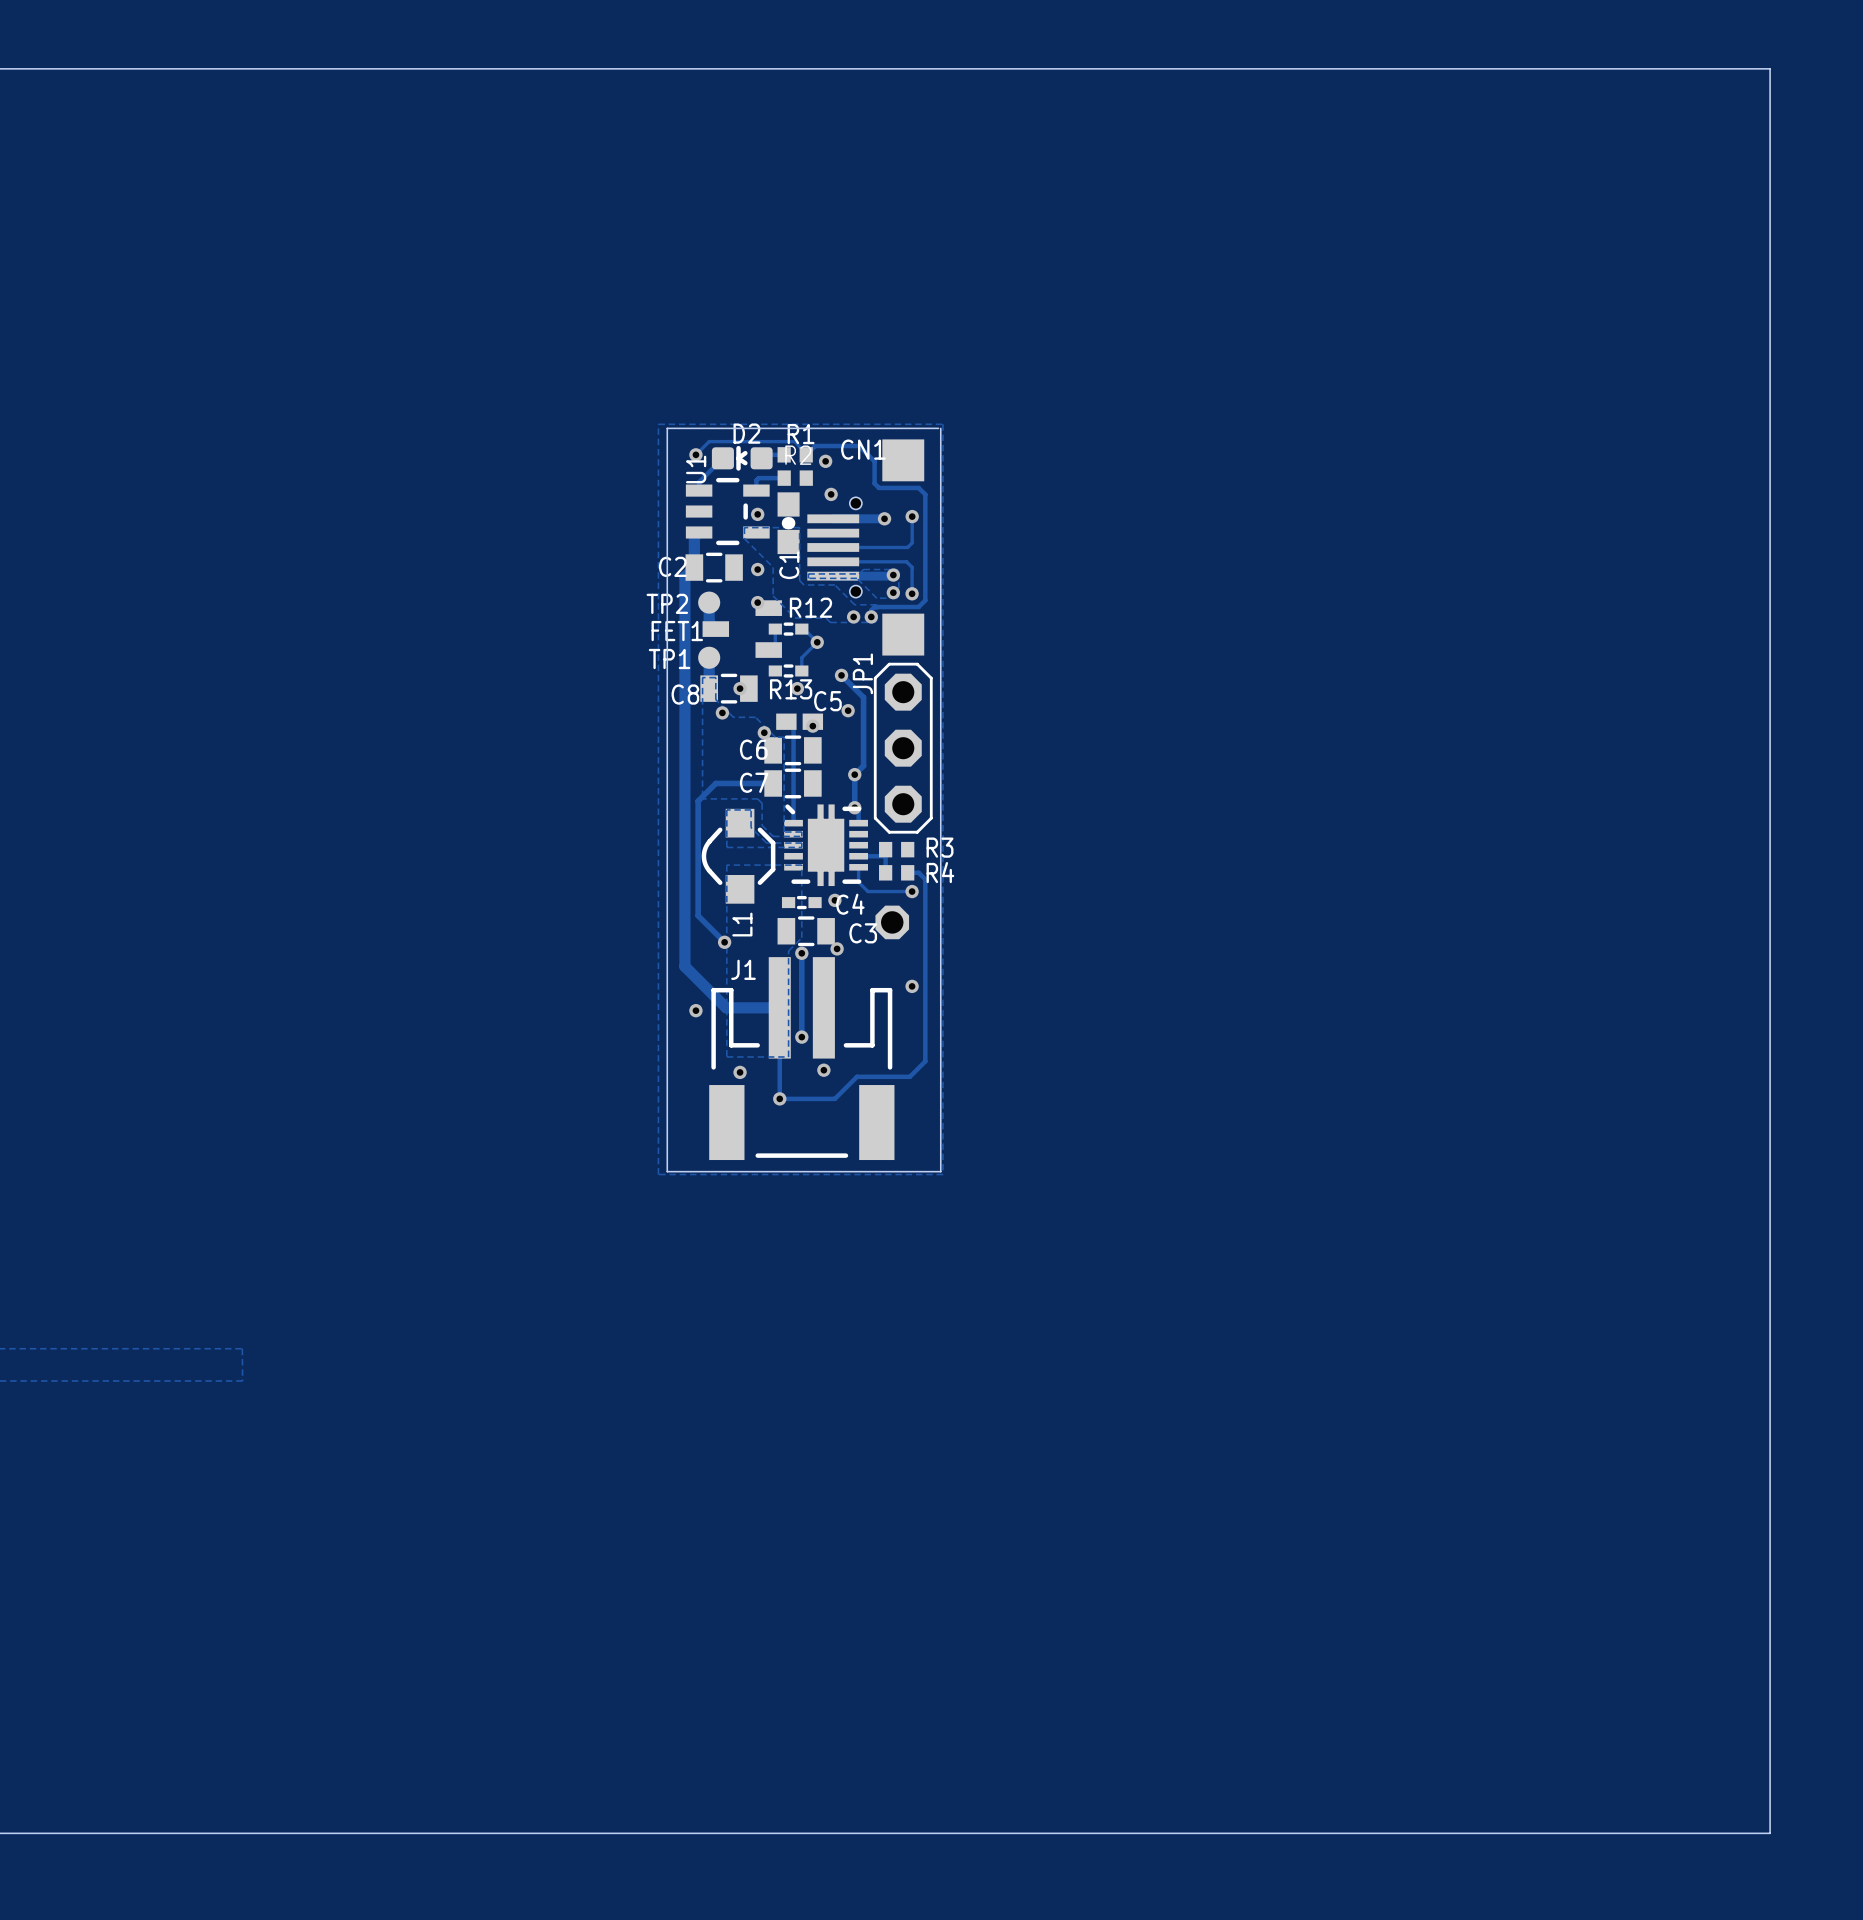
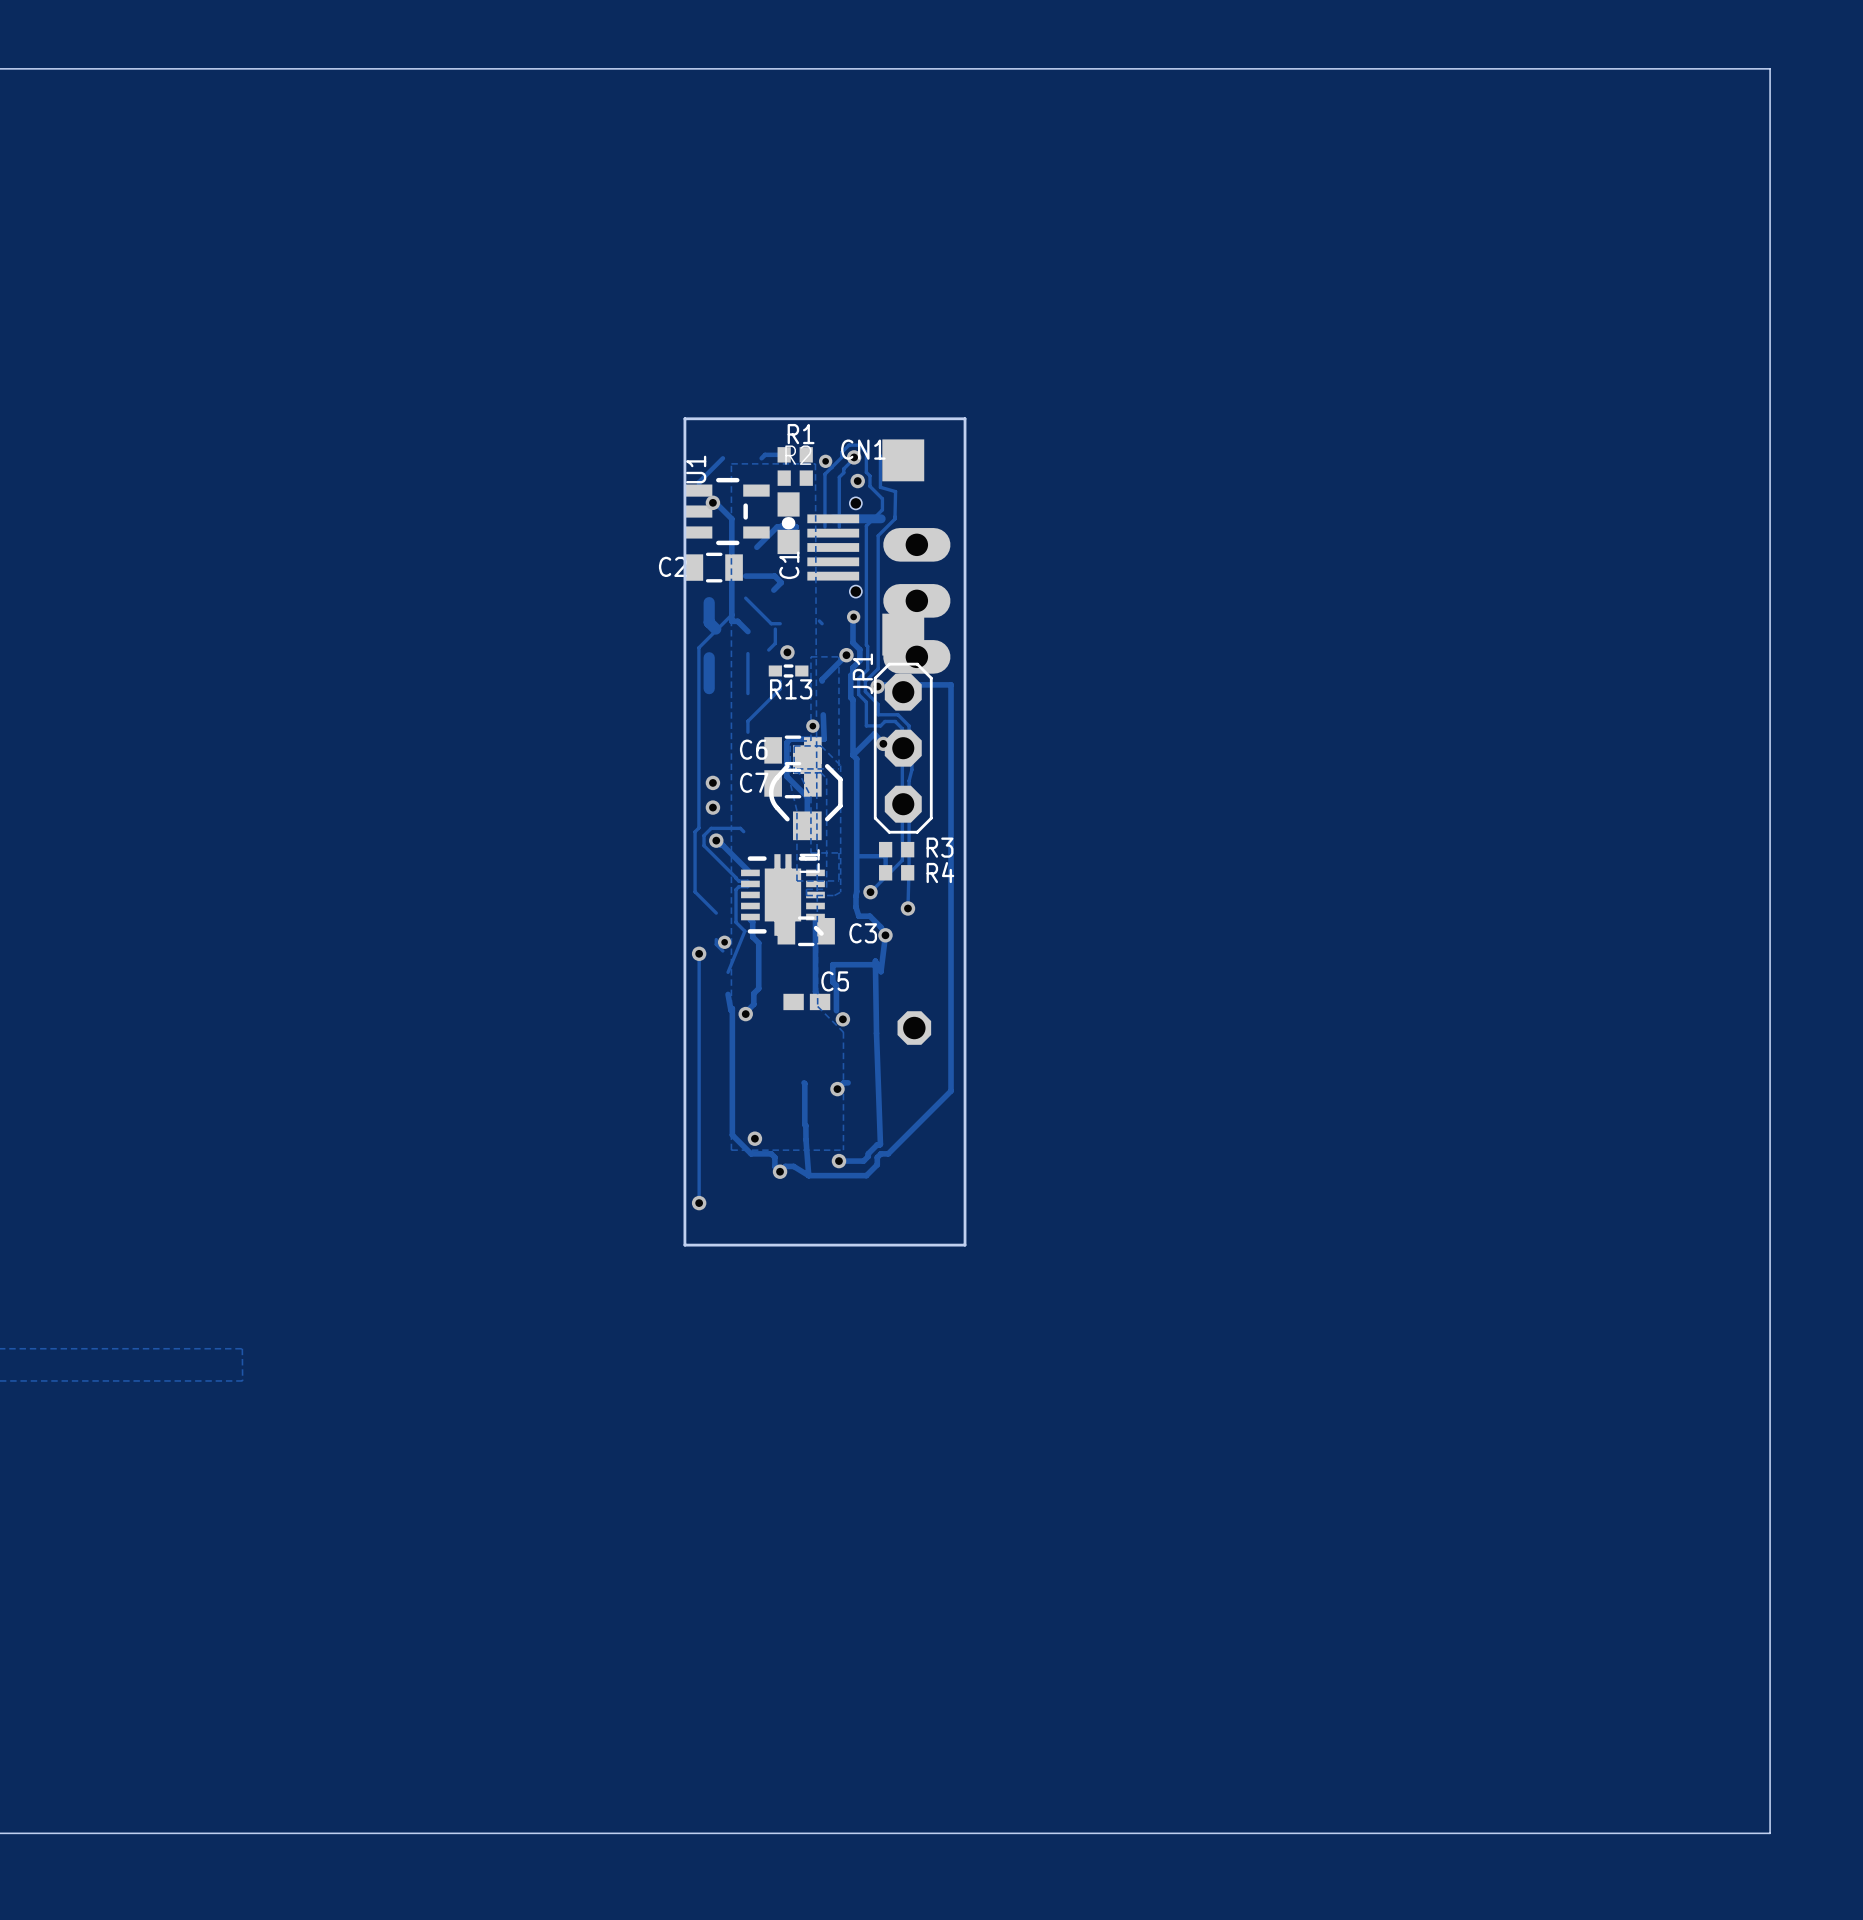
board edge: none -> (684, 418) (965, 418) (965, 1245) (684, 1245) (684, 418)
zone outline: (658, 424) (942, 424) (942, 1174) (658, 1174) (658, 424) -> none
board edge: (938, 428) (667, 428) (667, 1171) (940, 1171) (940, 428) -> none
track: (695, 454) (709, 441) (795, 441) (806, 454) (815, 446) (859, 446) (874, 461) (874, 483) (879, 487) (918, 487) (925, 494) (925, 600) (918, 607) (874, 607) (871, 610) (871, 616) -> none
via: (695, 454) -> none
track: none -> (880, 455) (880, 487) (895, 491) (895, 518) (878, 535) (878, 668) (865, 681) (865, 691) (878, 704) (878, 714) (897, 714) (909, 725) (911, 769) (909, 780) (907, 908)
track: none -> (854, 457) (839, 477) (839, 526)
via: none -> (854, 457)
D2: (742, 458) -> none
zone outline: none -> (731, 463) (815, 463) (817, 1006) (843, 1032) (843, 1150) (731, 1150) (731, 463)
track: (784, 478) (758, 478) (756, 480) (756, 490) -> none
via: none -> (857, 481)
via: (831, 494) -> none
track: none -> (712, 502) (715, 502) (731, 518) (731, 621) (737, 621) (747, 631)
via: none -> (712, 502)
via: (757, 514) -> none
track: (912, 516) (912, 542) (907, 547) (833, 547) -> none
via: (912, 516) -> none
via: (884, 518) -> none
track: none -> (781, 525) (796, 526) (777, 526) (756, 547)
track: none -> (824, 526) (824, 474) (841, 457) (841, 452) (849, 445) (859, 445) (866, 452) (866, 472) (869, 475) (869, 486) (882, 498) (882, 509) (866, 525) (867, 669) (858, 678) (858, 694) (866, 702) (866, 725) (880, 725) (885, 721) (895, 721) (902, 728) (902, 860) (870, 892)
zone outline: (744, 527) (799, 527) (799, 580) (804, 584) (834, 584) (854, 604) (876, 604) (876, 620) (874, 622) (830, 622) (826, 618) (795, 618) (773, 596) (773, 567) (744, 538) (744, 527) -> none
track: (699, 532) (694, 537) (694, 567) (684, 577) (684, 966) (726, 1007) (779, 1007) -> none
track: (833, 561) (906, 561) (912, 567) (912, 593) -> none
via: (757, 569) -> none
zone outline: (863, 569) (859, 573) (808, 573) (808, 578) (856, 578) (876, 598) (896, 598) (898, 596) (898, 571) (896, 569) (863, 569) -> none
track: (893, 575) (833, 576) -> none
via: (893, 575) -> none
track: none -> (745, 576) (774, 576) (781, 582) (773, 590)
via: (893, 592) -> none
via: (912, 593) -> none
track: none -> (745, 598) (771, 623) (780, 623)
part: none -> (916, 600)
TP2: (709, 602) -> none
via: (757, 602) -> none
track: none -> (731, 614) (698, 647) (698, 827) (695, 831) (695, 891) (716, 913)
via: (871, 616) -> none
track: none -> (852, 619) (852, 642) (859, 649) (859, 660) (852, 667) (852, 673) (850, 675) (850, 697) (852, 699) (852, 755)
track: none -> (819, 620) (822, 623)
FET1: (742, 629) -> none
R12: (788, 629) -> none
track: (801, 629) (817, 642) (801, 657) (801, 670) -> none
via: (817, 642) -> none
via: none -> (787, 652)
track: none -> (747, 653) (747, 693)
track: none -> (846, 655) (822, 681)
via: none -> (846, 655)
zone outline: none -> (810, 656) (810, 740) (790, 740) (790, 782) (796, 810) (796, 880) (838, 880) (838, 852) (810, 852) (810, 796) (796, 768) (838, 768) (838, 656) (810, 656)
TP1: (709, 657) -> none
track: (841, 675) (863, 697) (863, 765) (854, 774) (854, 807) (858, 811) (858, 823) -> none
via: (841, 675) -> none
zone outline: (702, 677) (715, 677) (715, 699) (733, 717) (755, 717) (775, 737) (784, 737) (784, 832) (801, 832) (801, 836) (773, 836) (762, 825) (762, 803) (757, 798) (700, 798) (702, 796) (702, 677) -> none
track: none -> (780, 681) (780, 688) (747, 721) (747, 732)
track: none -> (877, 686) (879, 684) (951, 684) (951, 1091) (888, 1153) (880, 1153) (877, 1157) (877, 1164) (866, 1175) (808, 1175)
via: none -> (877, 686)
C8: (729, 688) -> none
via: (740, 688) -> none
via: (797, 688) -> none
via: (848, 710) -> none
via: (722, 712) -> none
track: none -> (823, 714) (824, 739) (790, 739) (786, 742) (786, 776) (807, 797) (807, 825)
track: (786, 721) (793, 728) (793, 823) -> none
C5 position: (799, 721) -> (806, 1001)
via: (764, 732) -> none
track: none -> (883, 743) (874, 733) (852, 755)
via: none -> (883, 743)
zone outline: none -> (794, 745) (821, 745) (840, 765) (840, 892) (834, 895) (806, 895) (806, 889) (826, 889) (826, 778) (820, 772) (794, 772) (794, 745)
track: none -> (852, 755) (856, 758) (856, 907) (858, 916) (869, 916) (880, 927) (885, 935) (880, 971) (875, 961) (880, 1144) (877, 1144) (863, 1161) (838, 1161)
via: (854, 774) -> none
via: none -> (712, 782)
track: (773, 783) (715, 783) (698, 801) (698, 915) (724, 942) -> none
via: none -> (712, 807)
via: (854, 807) -> none
zone outline: (726, 809) (751, 809) (751, 827) (766, 843) (801, 843) (801, 847) (726, 847) (726, 809) -> none
track: none -> (743, 831) (740, 828) (711, 828) (704, 835) (704, 845) (738, 881) (747, 881) (750, 883) (747, 886) (738, 886) (736, 889) (736, 922) (744, 931) (728, 972)
track: none -> (716, 840) (750, 872)
via: none -> (716, 840)
part rotation: 0° (826, 845) -> 180° (782, 894)
part position: (826, 845) -> (782, 894)
L1 position: (738, 856) -> (805, 792)
zone outline: (726, 865) (726, 1056) (788, 1056) (788, 951) (801, 937) (801, 865) (726, 865) -> none
track: (858, 867) (858, 882) (867, 891) (912, 891) -> none
track: (907, 872) (918, 872) (925, 879) (925, 1061) (909, 1076) (856, 1076) (834, 1098) (779, 1098) (779, 1007) -> none
via: (912, 891) -> none
via: none -> (870, 892)
via: (834, 900) -> none
C4: (801, 902) -> none
via: none -> (907, 908)
track: none -> (750, 917) (752, 922) (752, 936) (758, 943) (758, 988) (753, 993) (753, 1004) (745, 1014)
track: none -> (815, 917) (815, 991) (820, 1001)
part position: (892, 922) -> (914, 1028)
via: none -> (885, 935)
track: none -> (716, 939) (716, 944) (722, 950)
via: (837, 948) -> none
track: none -> (699, 953) (699, 1202)
via: none -> (699, 953)
track: (801, 953) (801, 1037) -> none
via: (801, 953) -> none
track: none -> (875, 965) (832, 964) (832, 982) (836, 985) (836, 1010)
via: (912, 986) -> none
track: none -> (728, 994) (730, 1010) (732, 1008) (732, 1135) (751, 1153) (771, 1153) (774, 1157) (774, 1166) (780, 1171) (785, 1166) (793, 1166) (808, 1175)
via: (695, 1010) -> none
via: none -> (745, 1014)
via: none -> (842, 1019)
via: (801, 1037) -> none
J1: (801, 1058) -> none
via: (823, 1070) -> none
via: (740, 1072) -> none
track: none -> (804, 1082) (808, 1175)
track: none -> (848, 1082) (843, 1082) (837, 1089)
via: none -> (837, 1089)
via: (779, 1098) -> none
via: none -> (754, 1138)
via: none -> (838, 1161)
via: none -> (780, 1171)
via: none -> (699, 1203)

